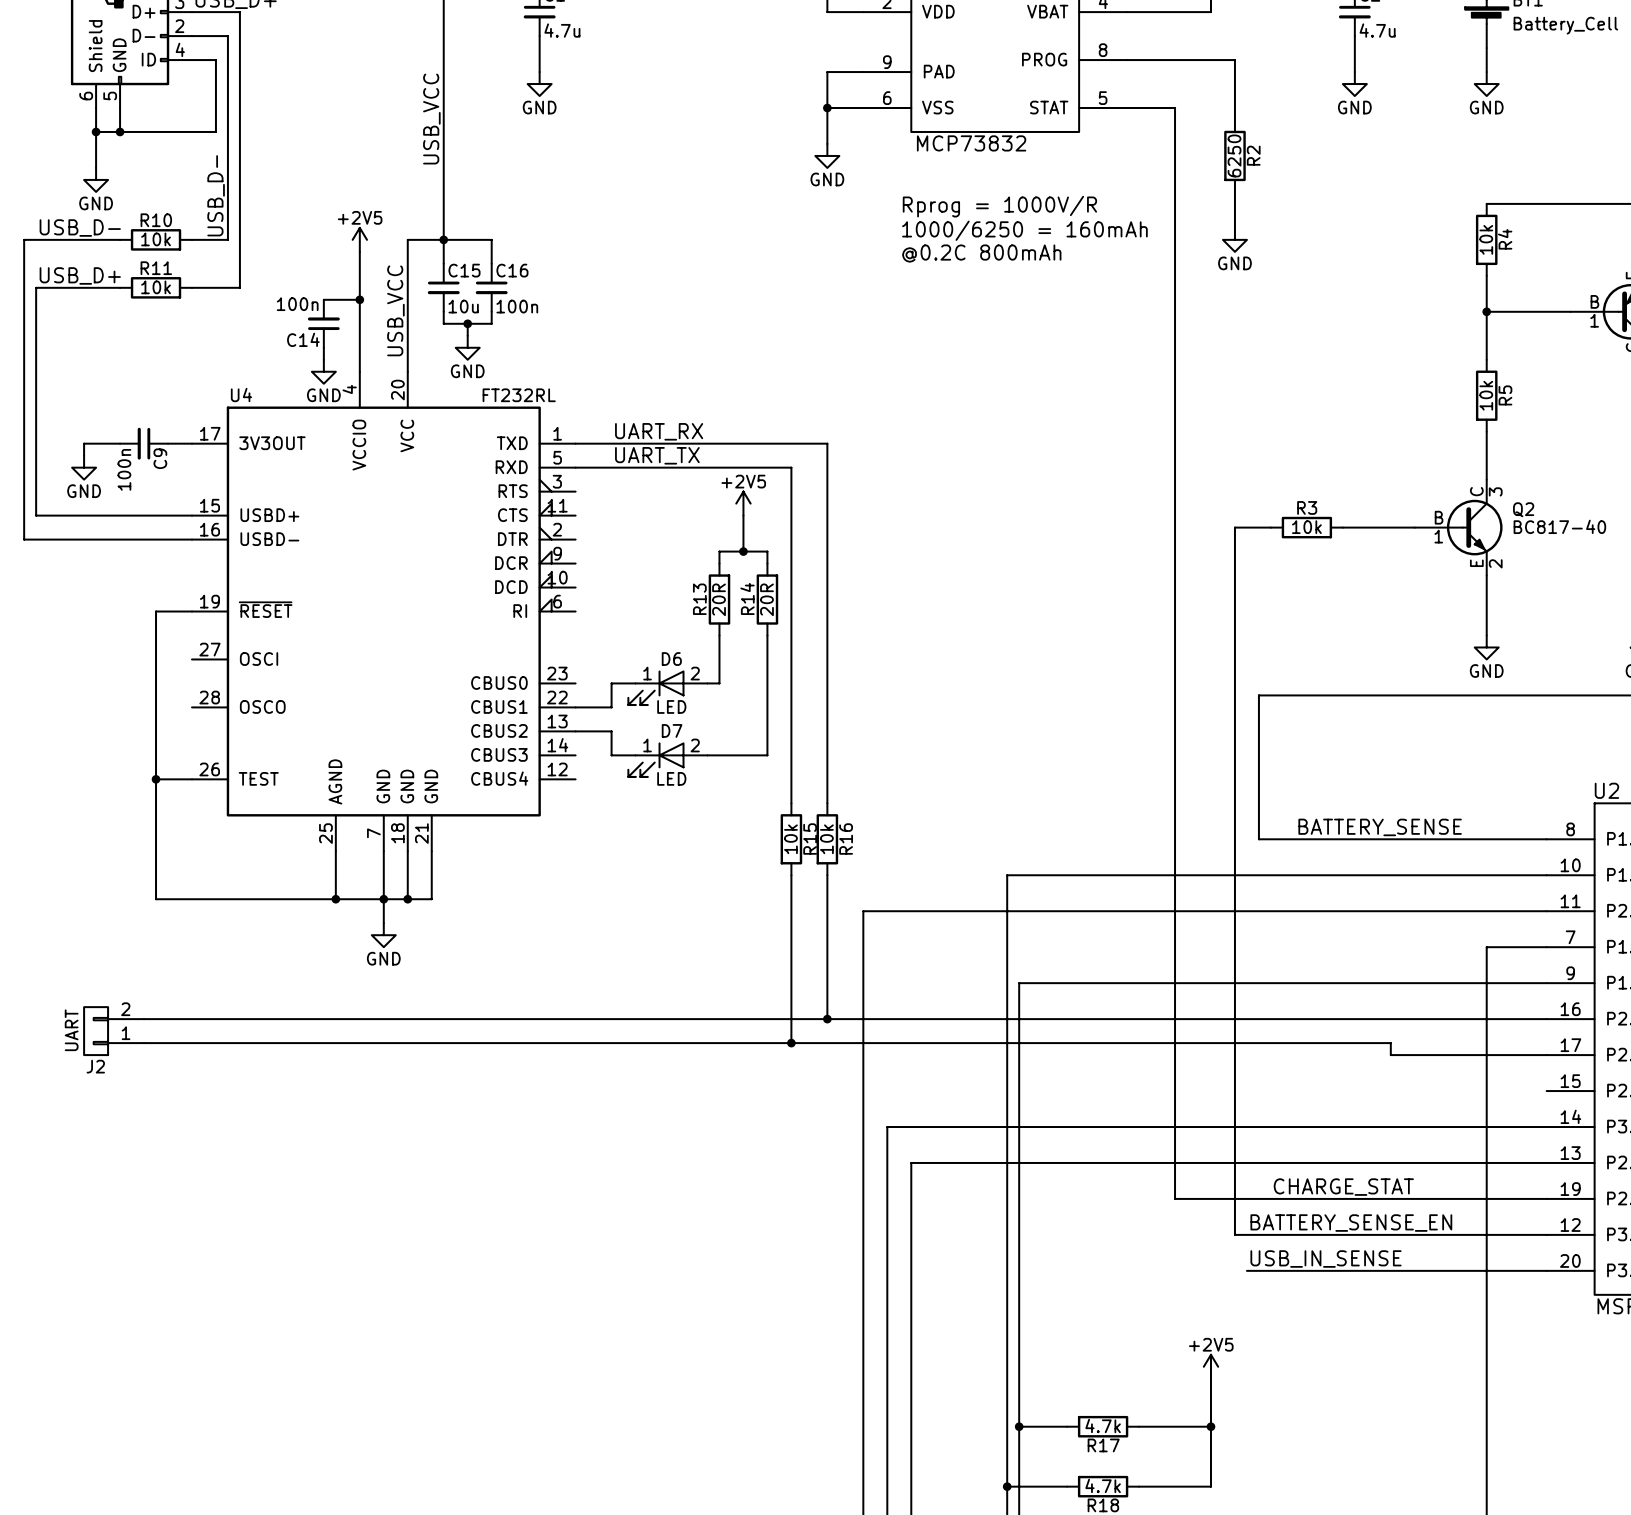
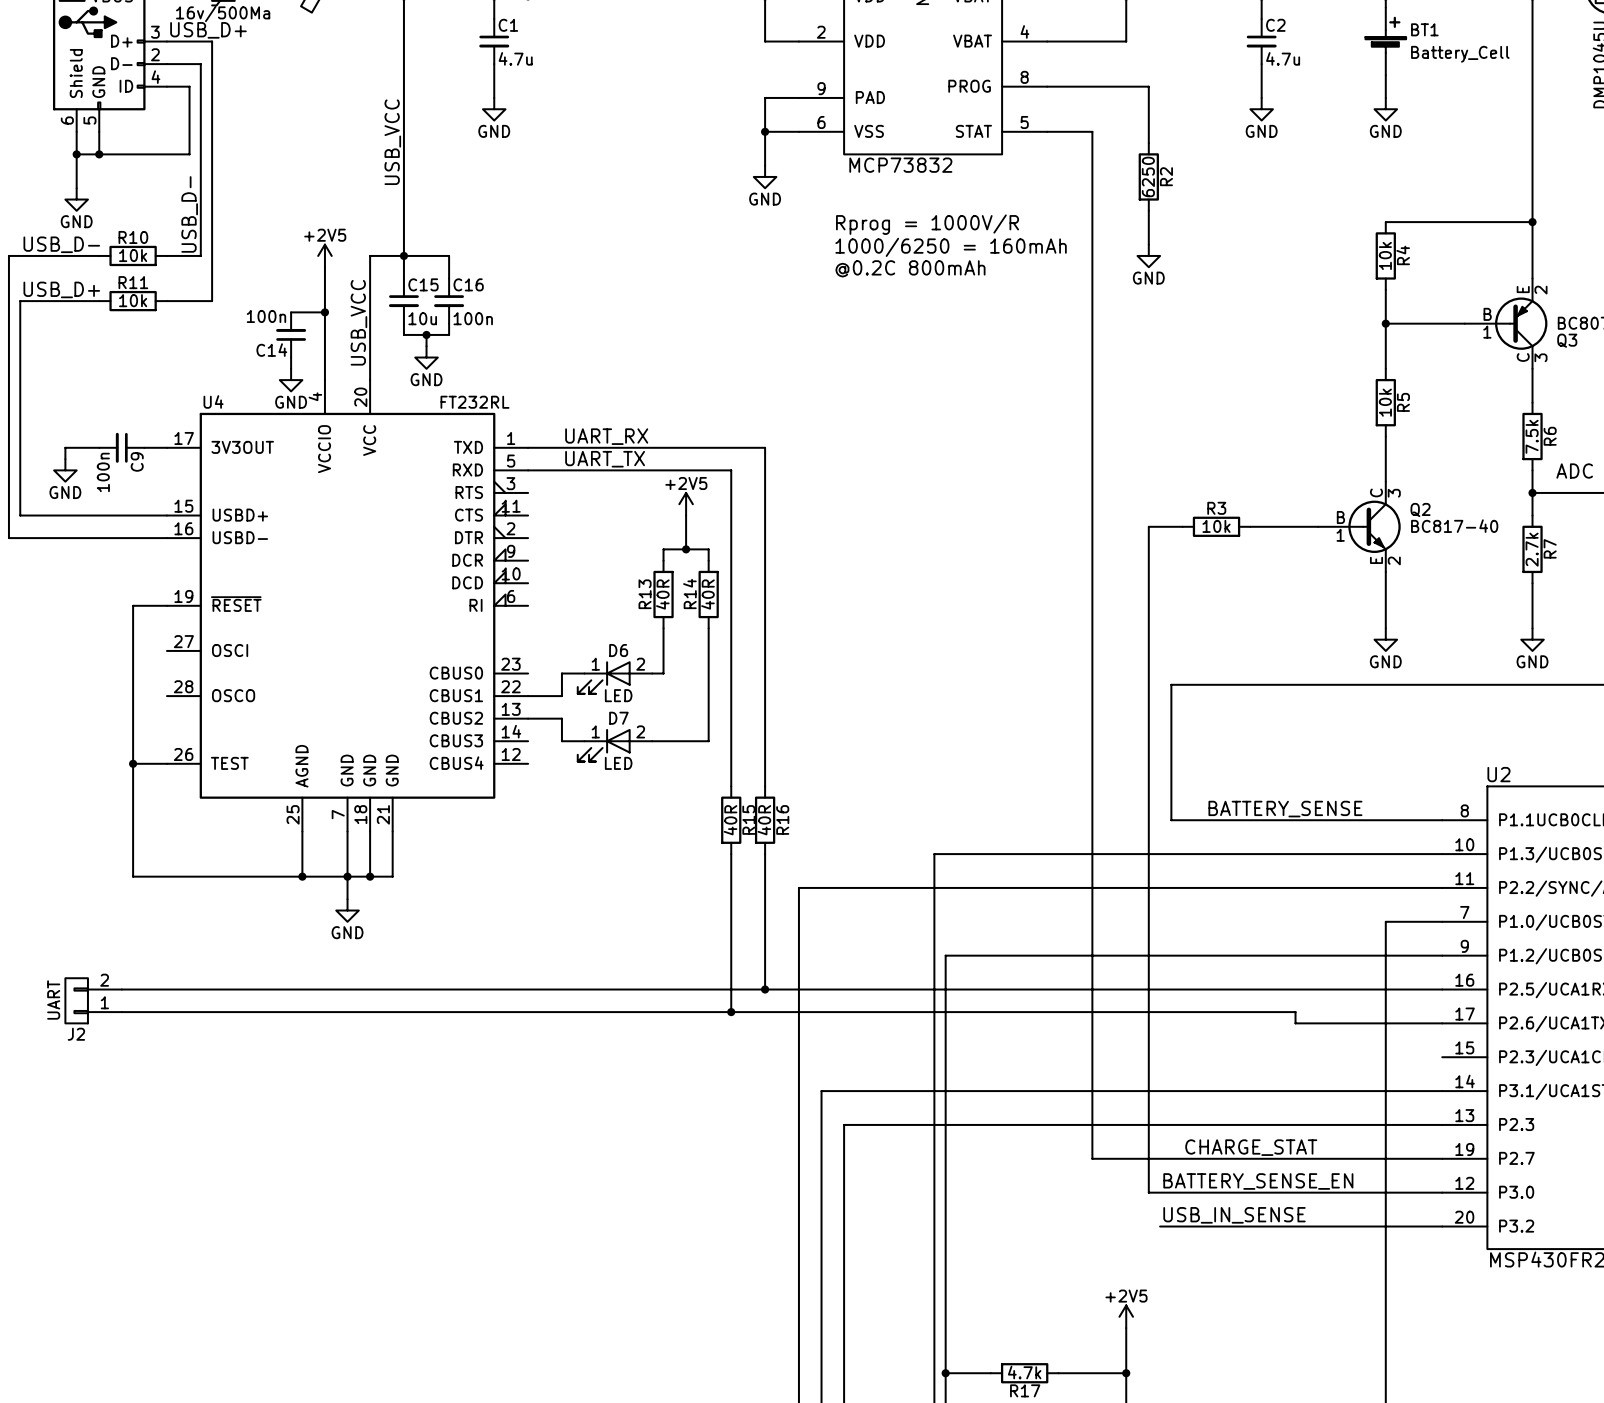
R13 value: 20R (719, 599) -> 40R (662, 594)
R14 value: 20R (766, 599) -> 40R (707, 594)
R15 value: 10k (790, 839) -> 40R (730, 820)
R16 value: 10k (826, 839) -> 40R (764, 820)

